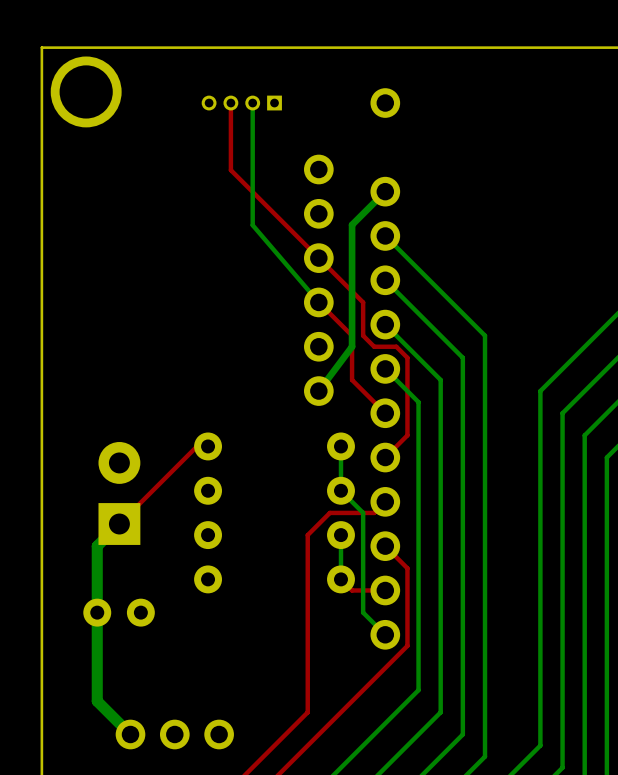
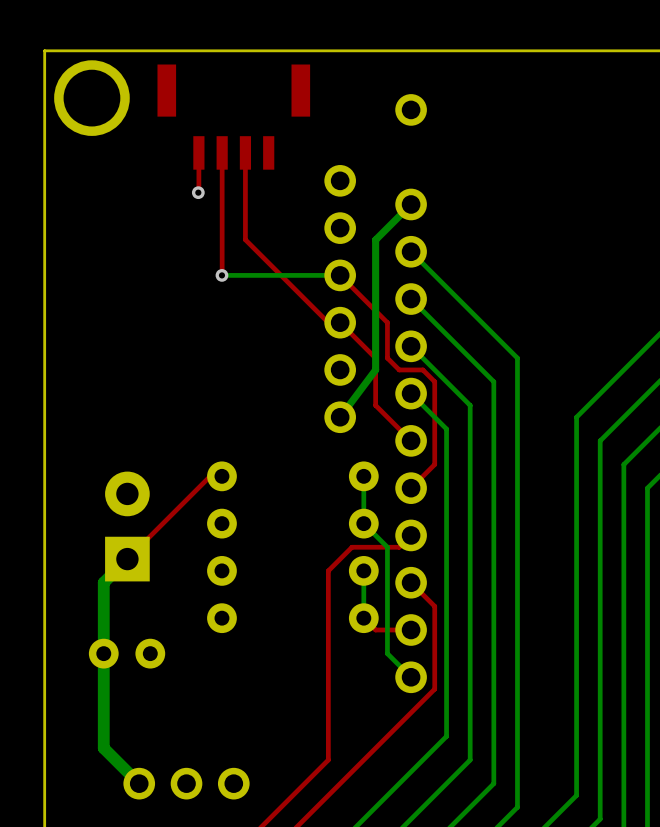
top track: (230, 103) (230, 170) (318, 258) -> none
part: (241, 103) -> none
bottom track: (252, 103) (252, 225) (318, 302) -> none
part: none -> (233, 117)
top track: none -> (198, 152) (198, 192)
top track: none -> (222, 152) (222, 275)
top track: none -> (245, 152) (245, 239) (328, 322) (340, 322)
via: none -> (198, 192)
via: none -> (221, 275)
bottom track: none -> (340, 275) (221, 275)

